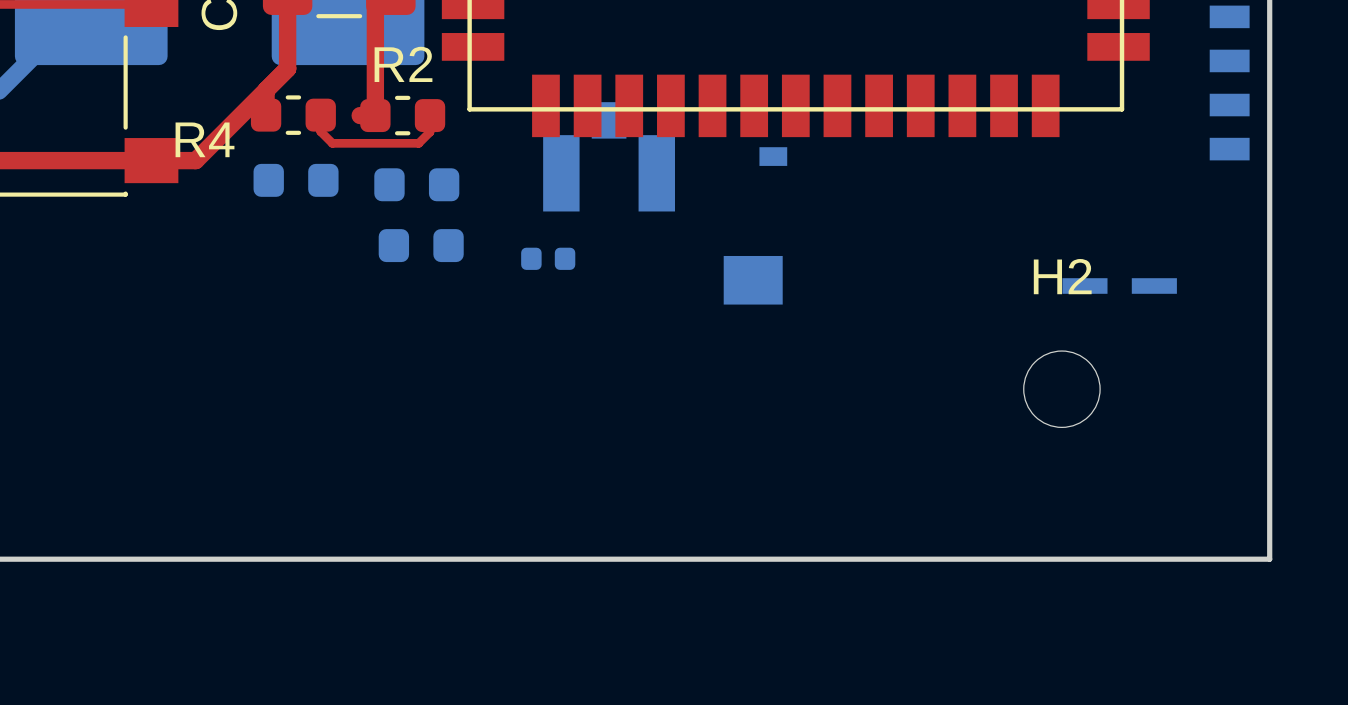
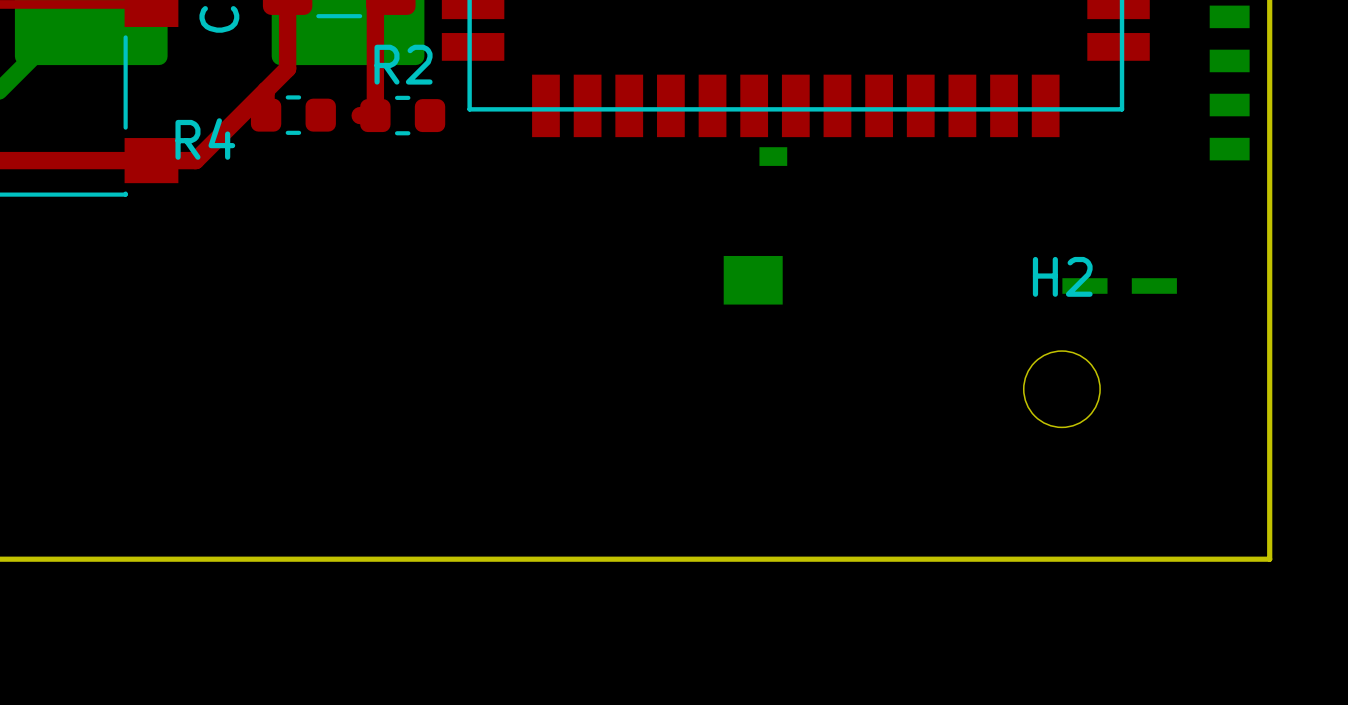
top track: (437, 107) (430, 115) (430, 132) (418, 143) (332, 143) (320, 131) (320, 115) -> none
part: (609, 156) -> none
part: (296, 180) -> none
part: (416, 184) -> none
part: (421, 245) -> none
part: (548, 258) -> none

